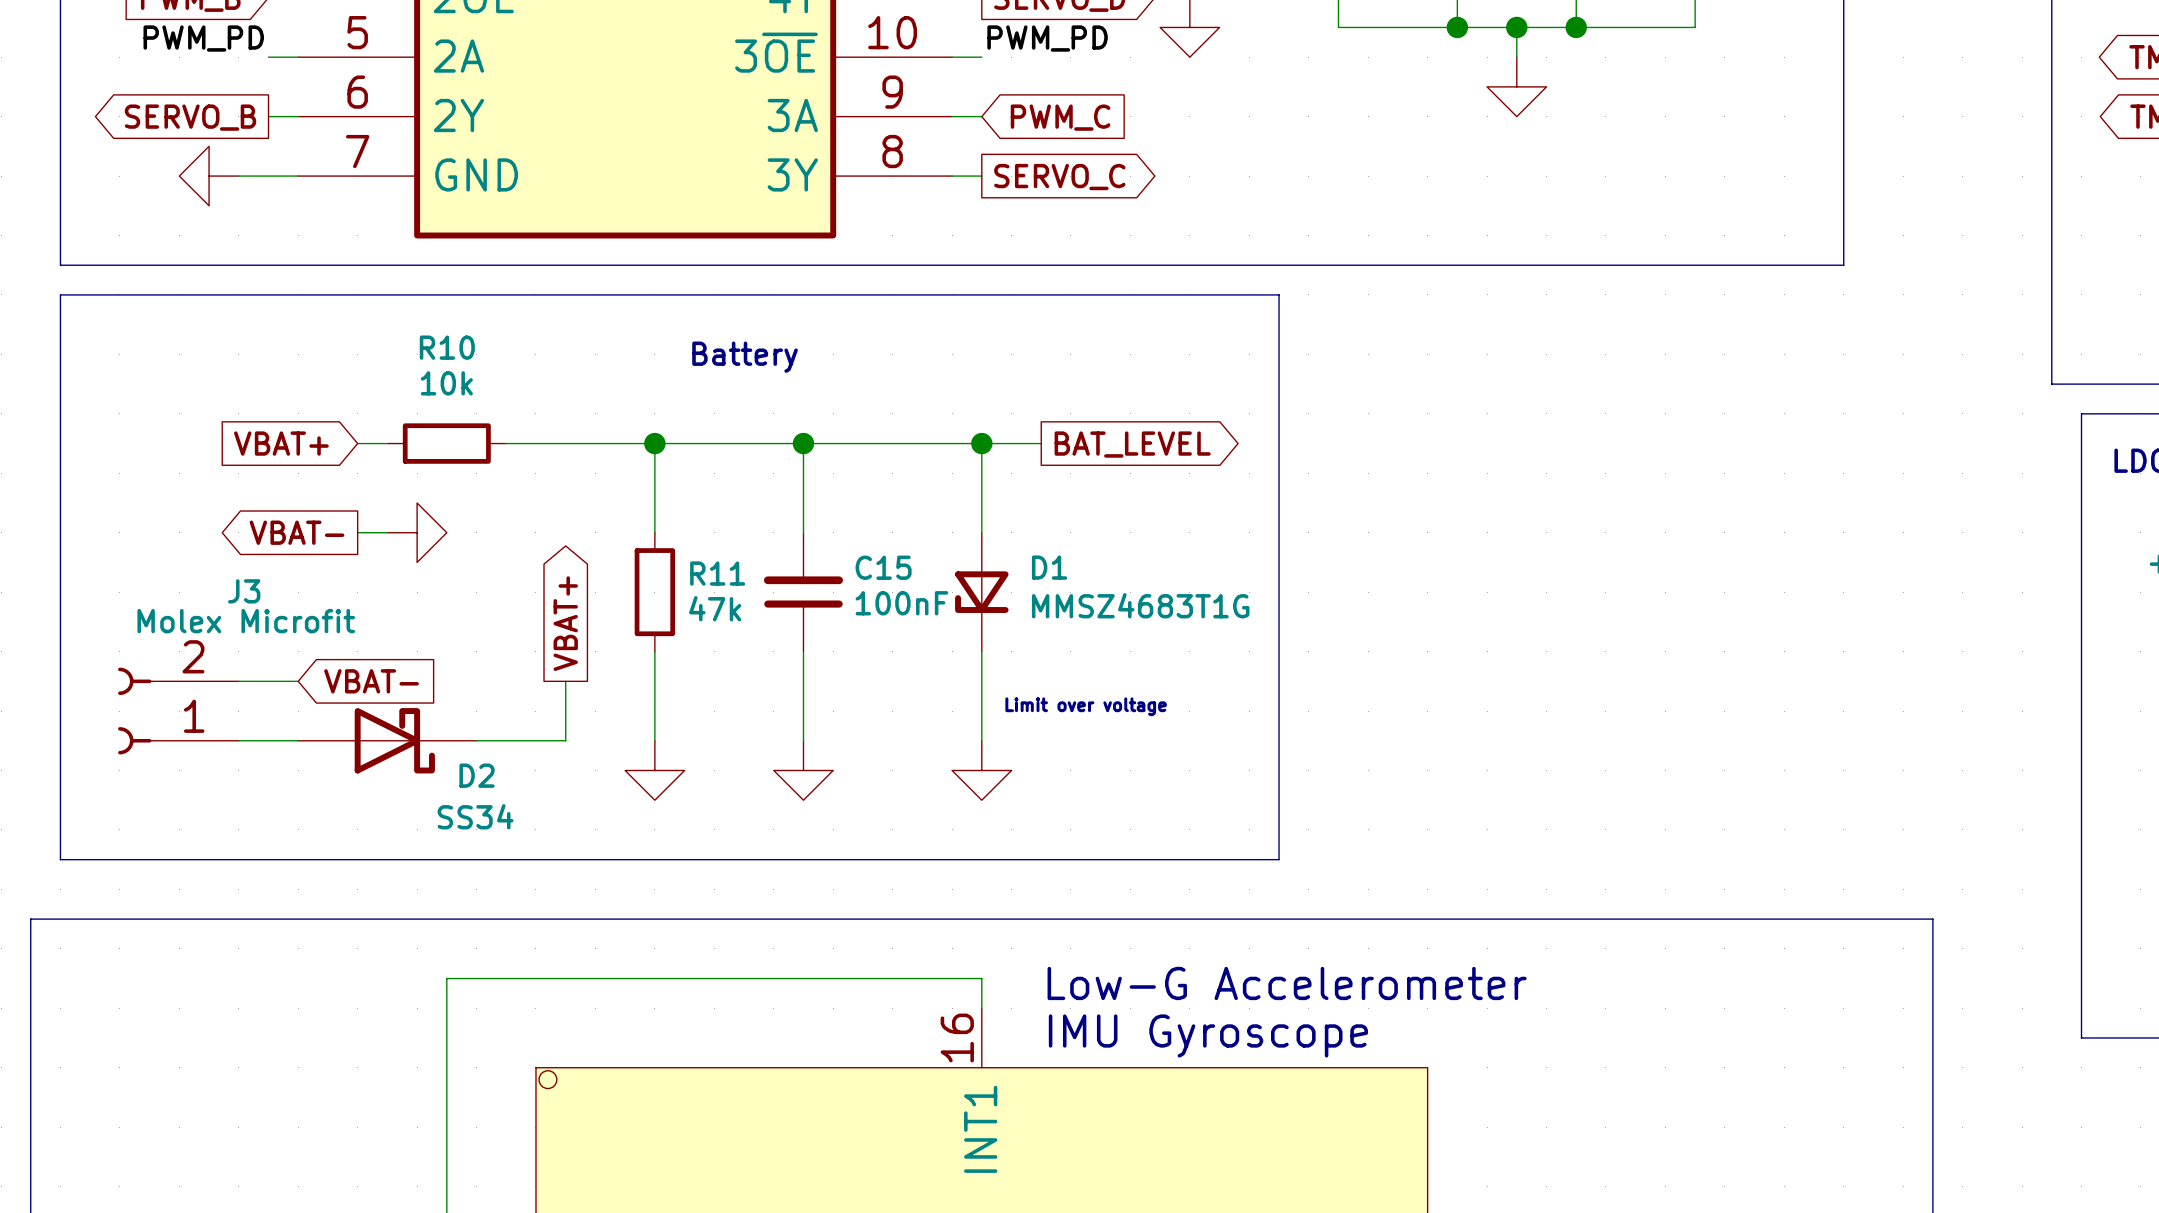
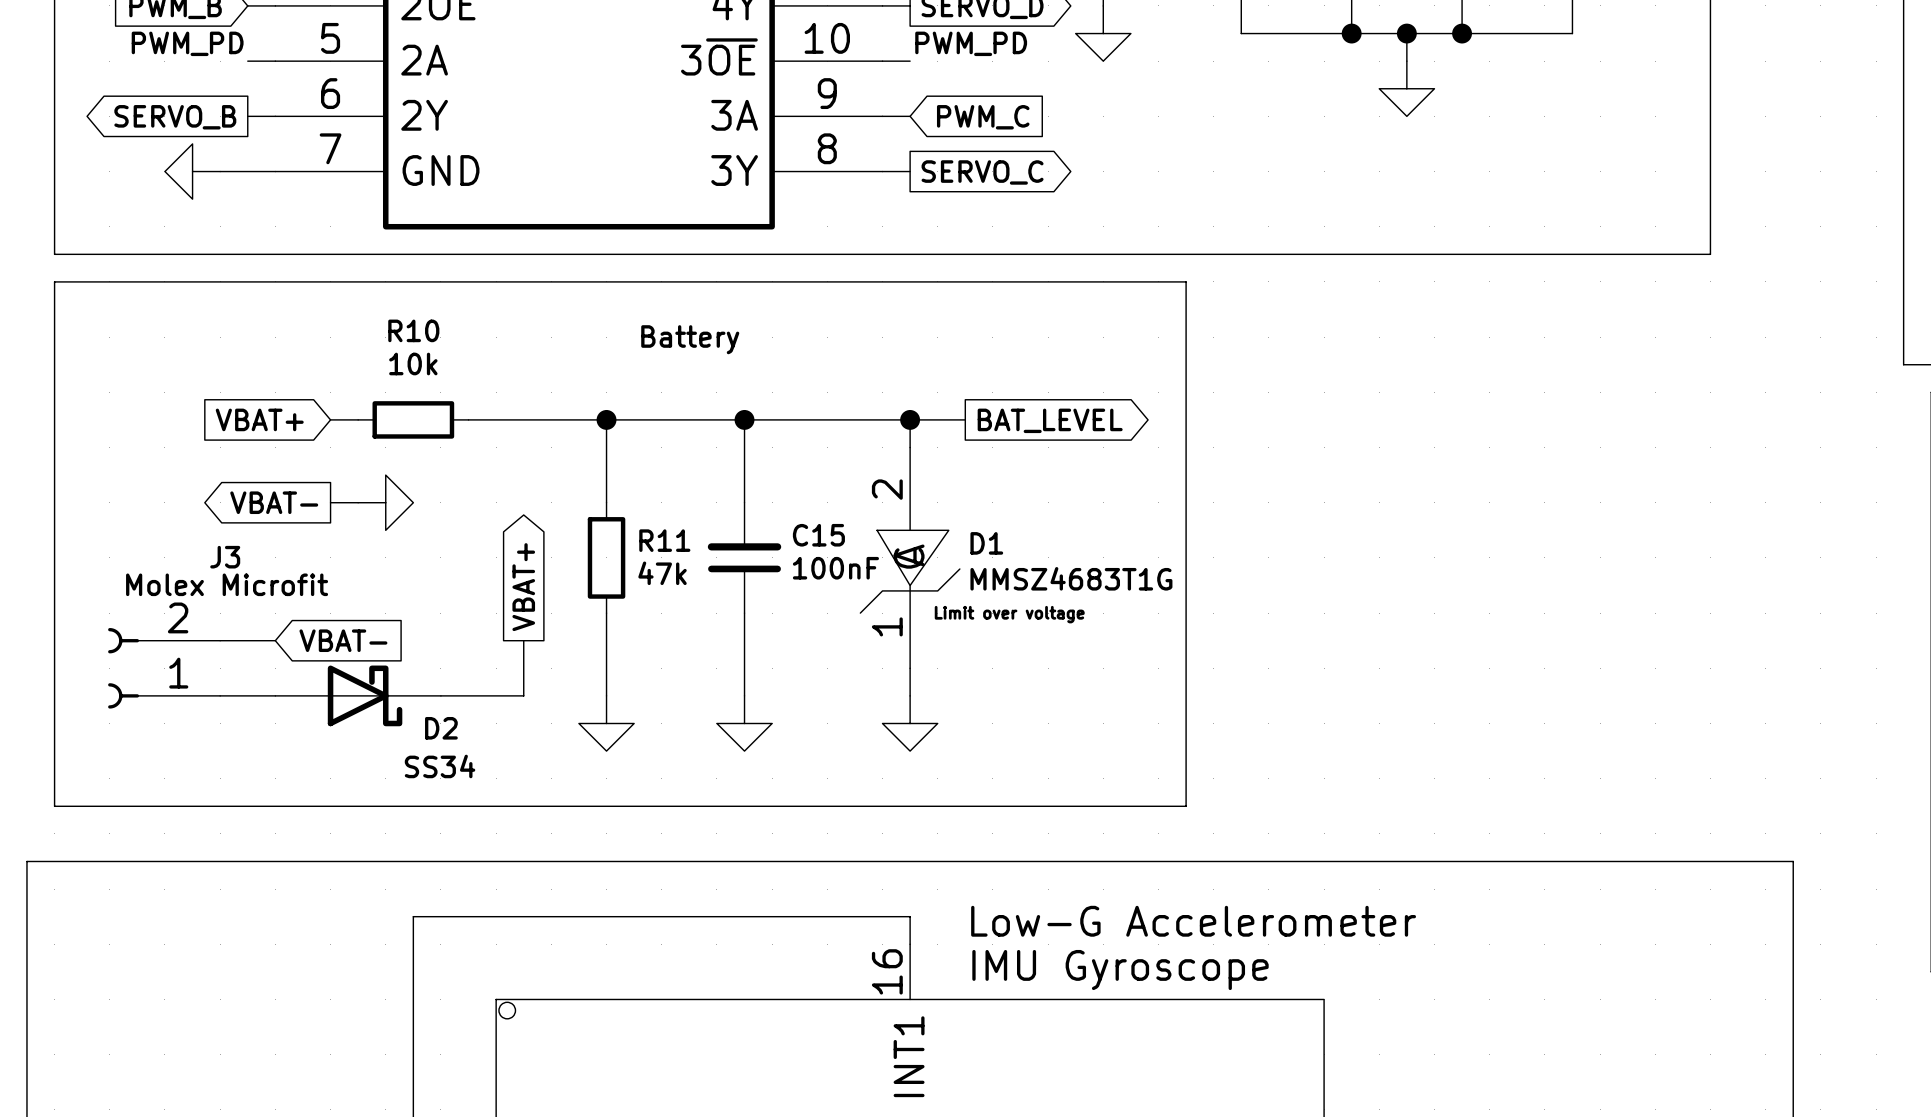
D1 symbol: [955, 532, 1009, 652] -> [860, 447, 960, 669]
text position: Limit over voltage (1086, 706) -> Limit over voltage (1009, 614)

